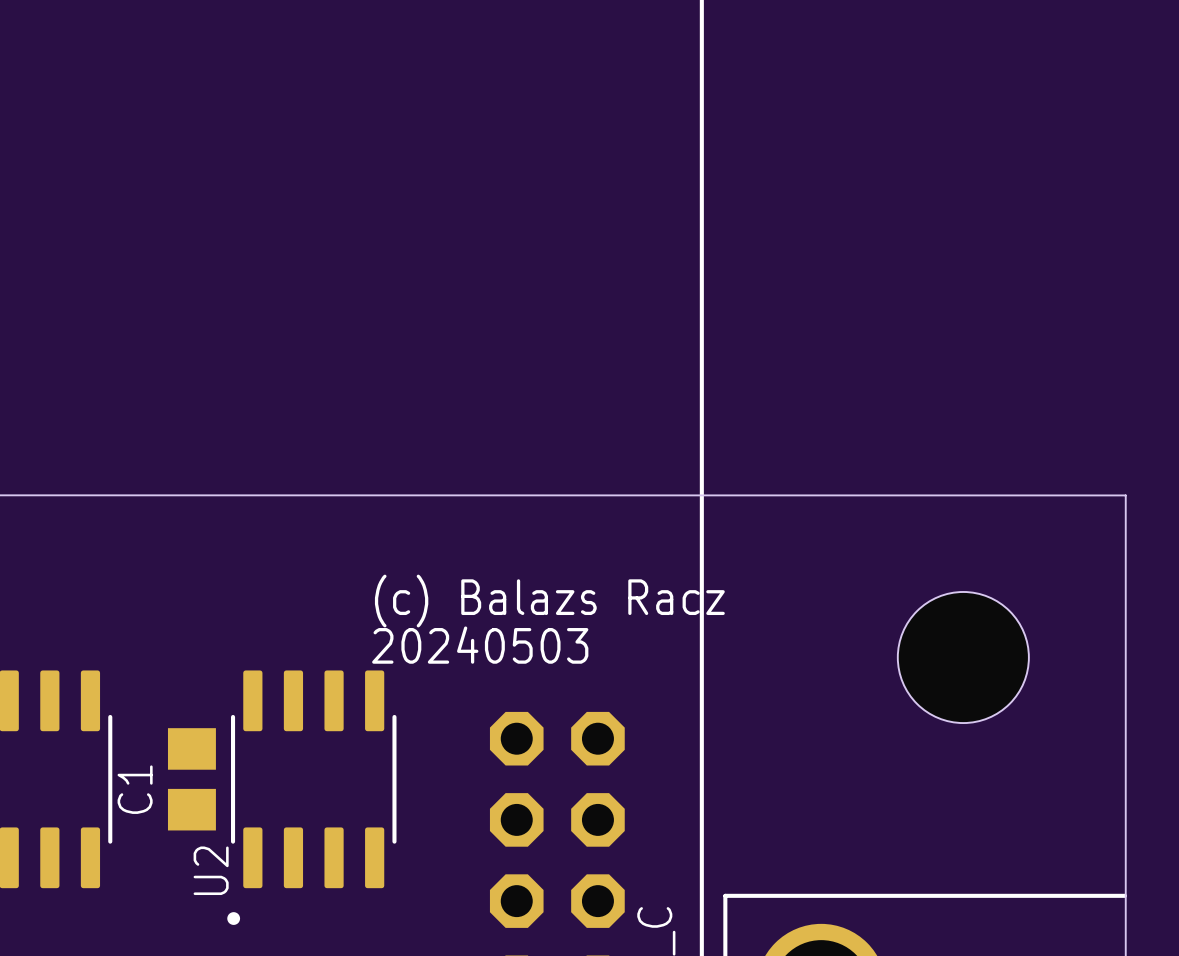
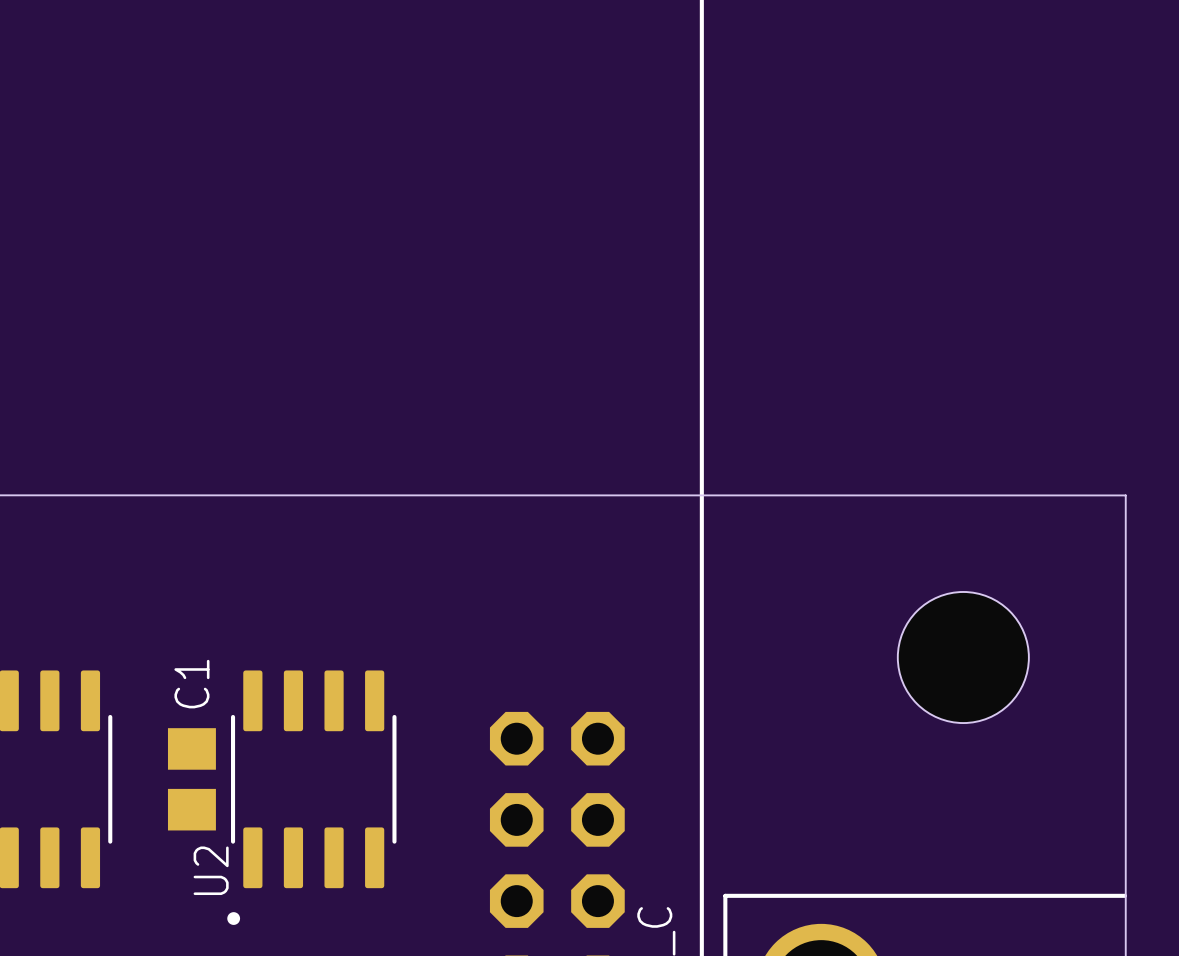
text: (c) Balazs Racz (549, 601) -> none
text: 20240503 (480, 645) -> none
C1 name position: C1 (135, 789) -> C1 (191, 684)

